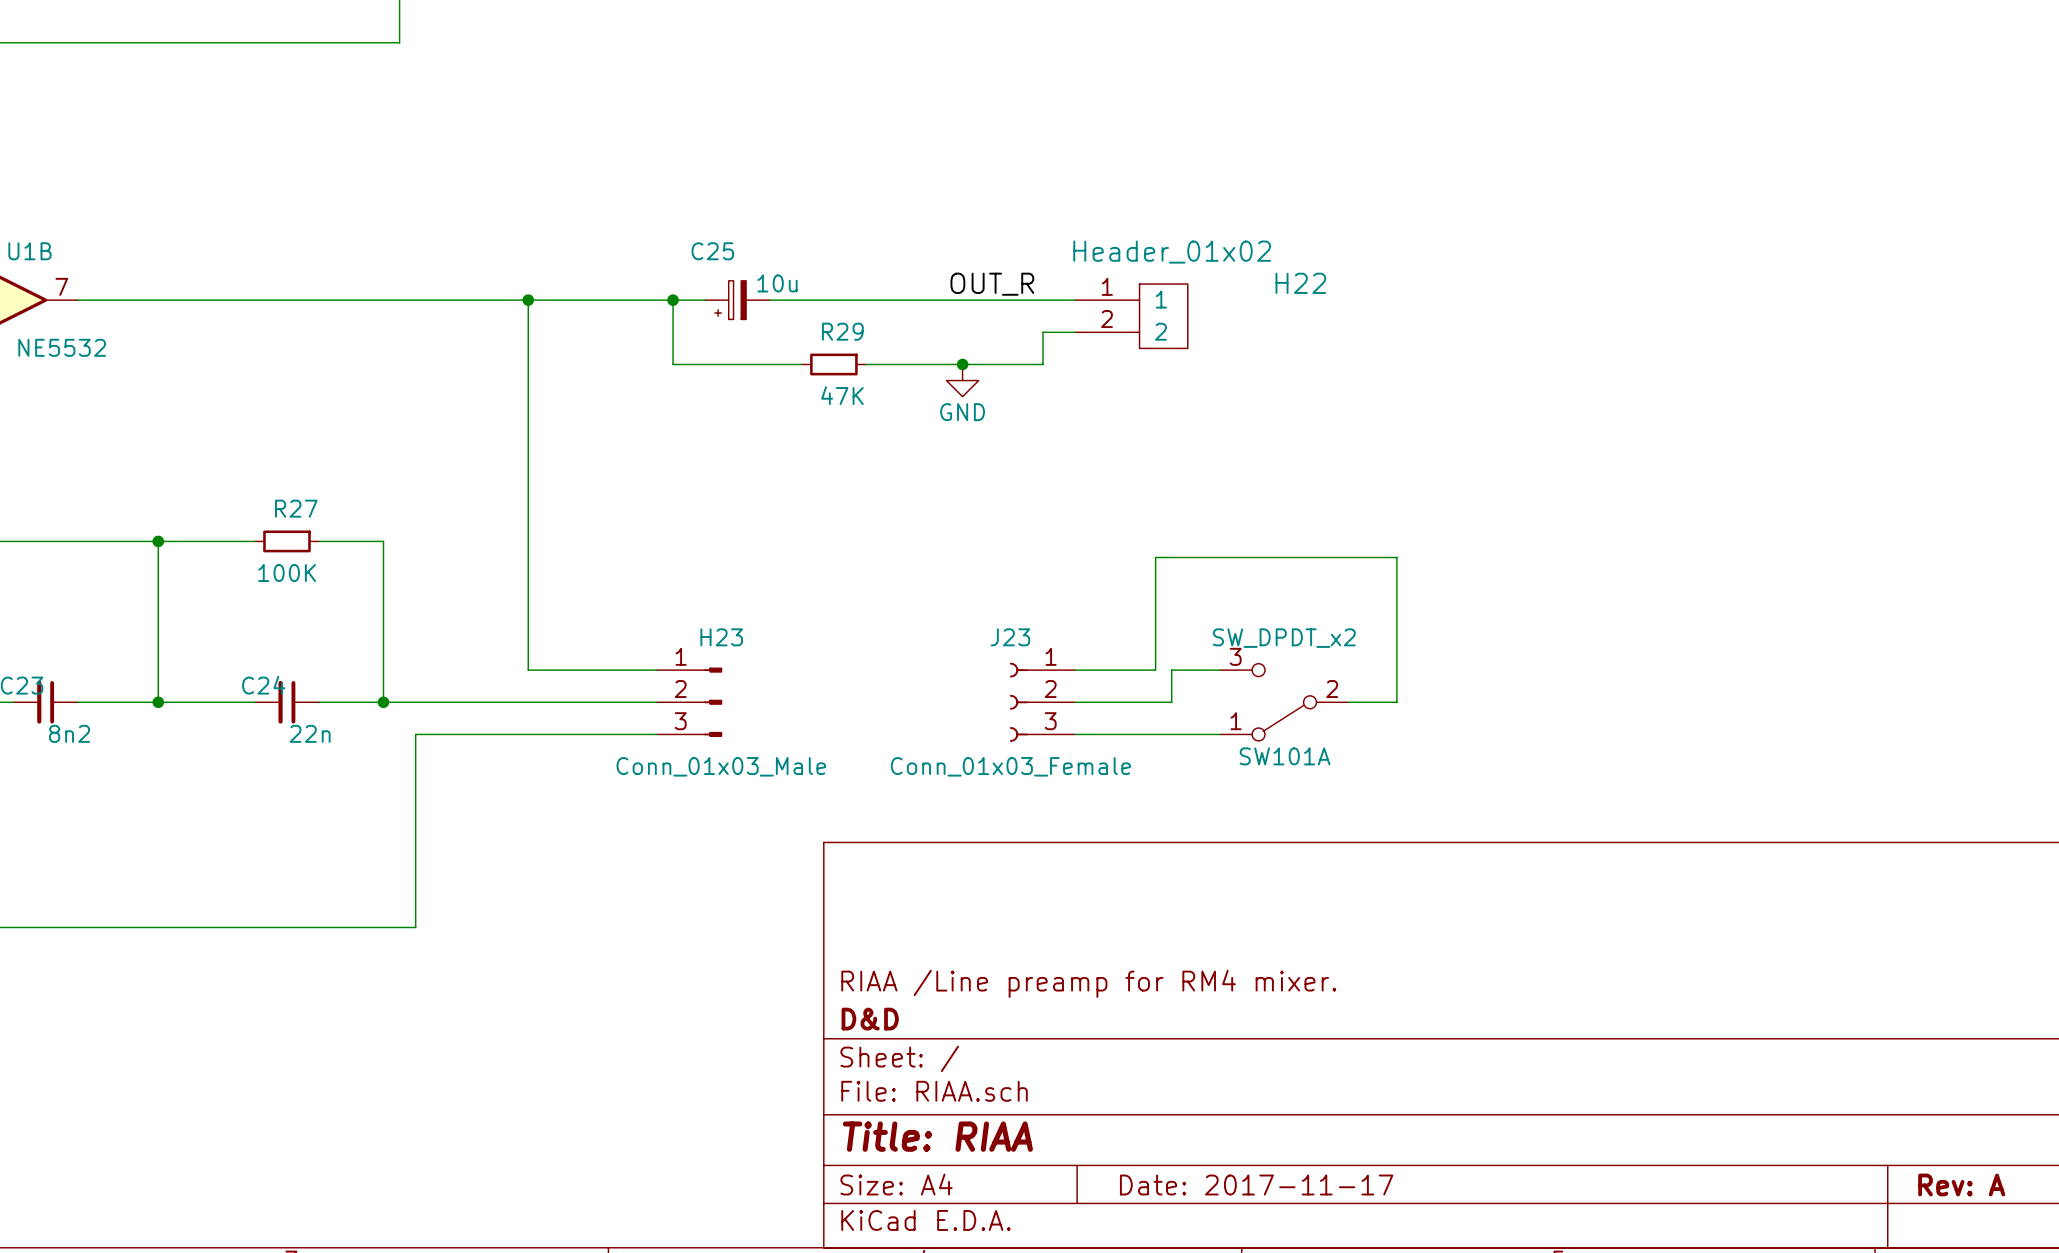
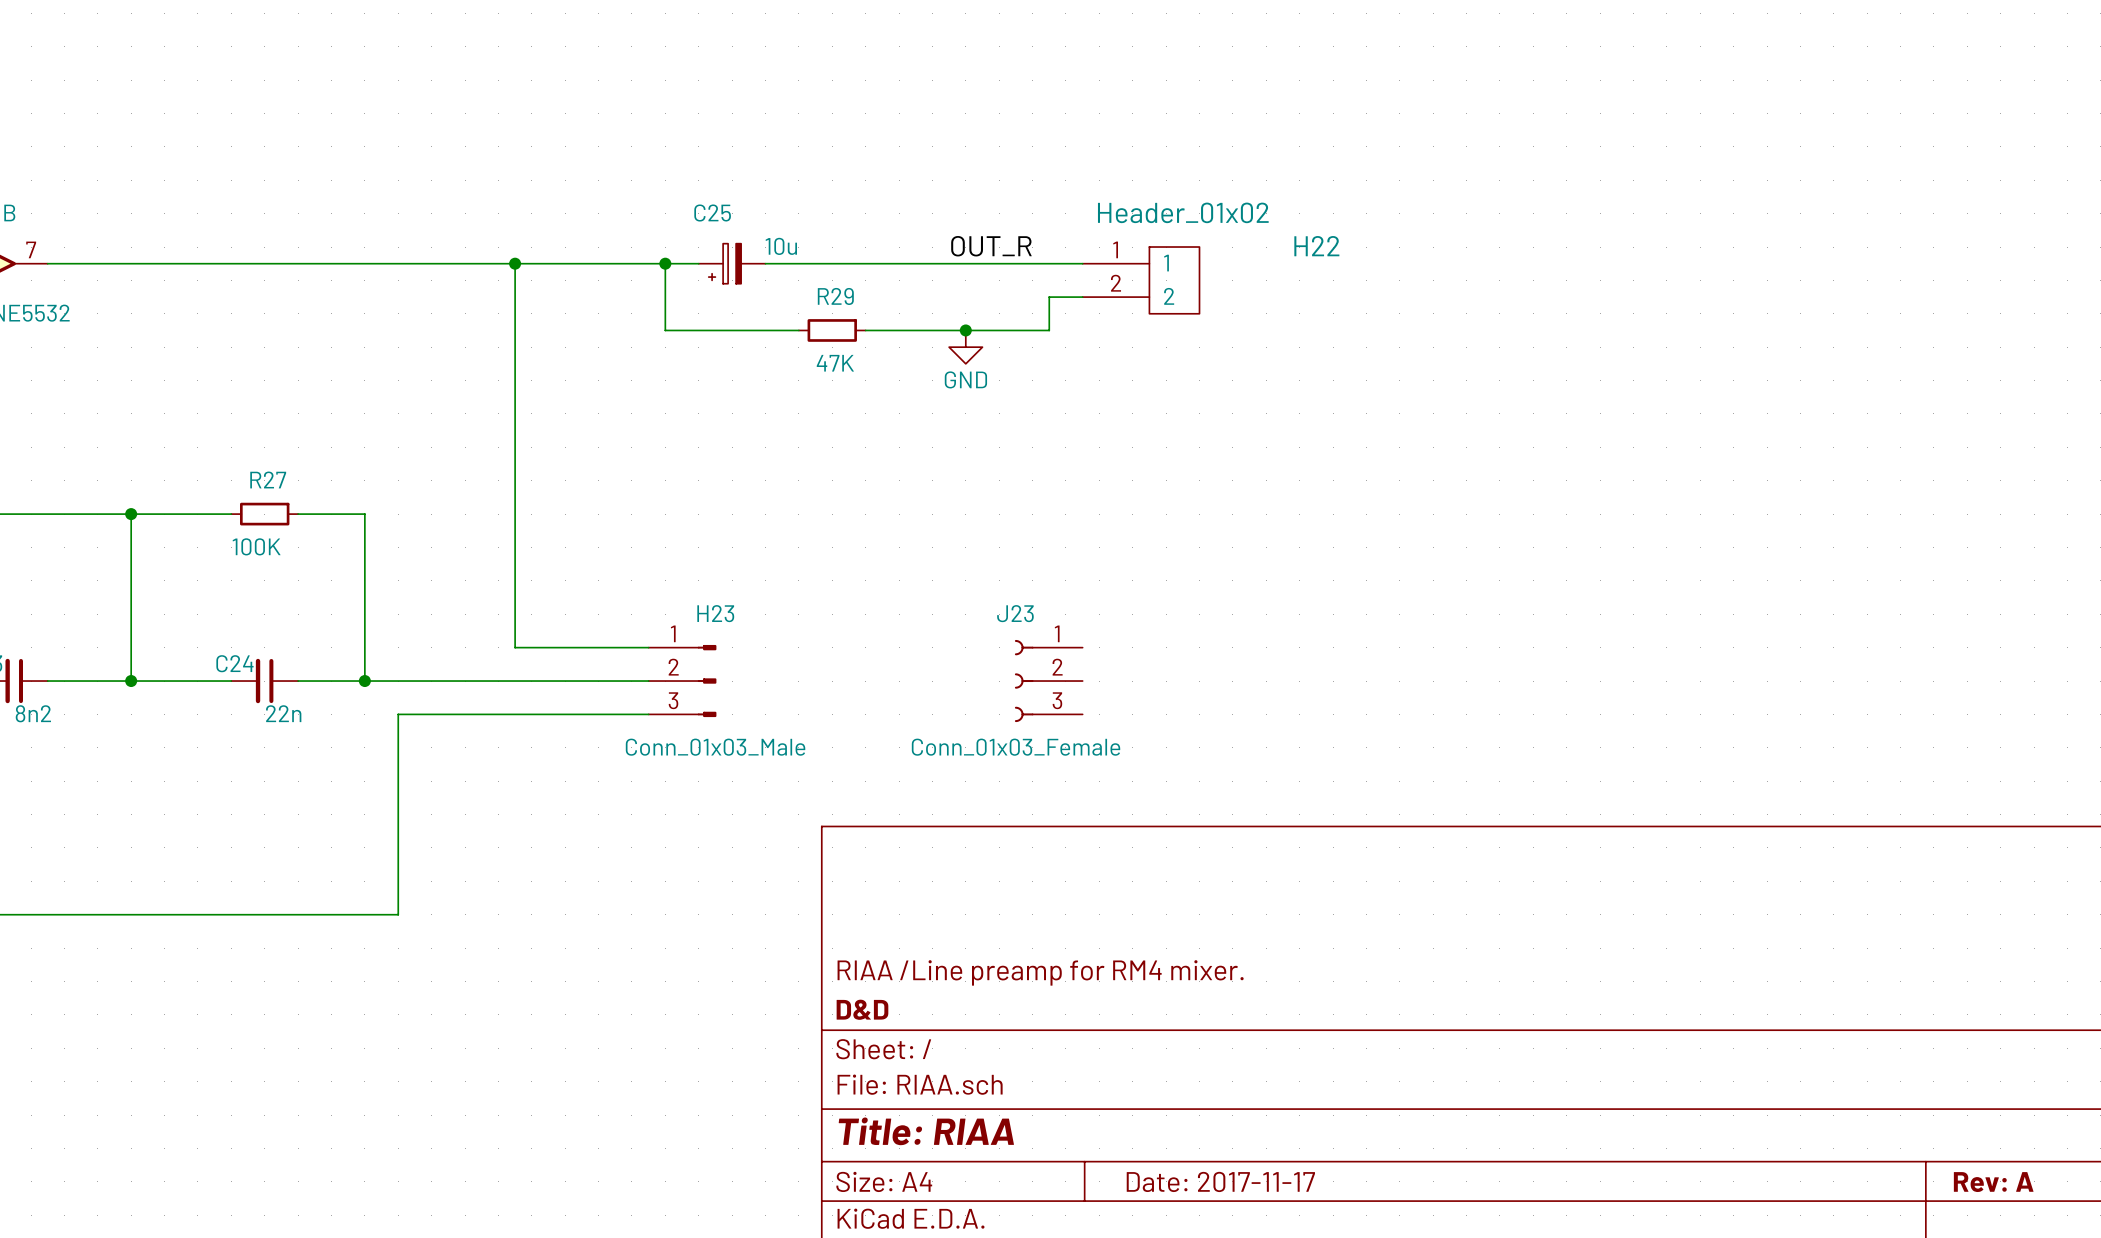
wire: (1075, 670) (1155, 670) (1155, 557) (1396, 557) (1396, 702) (1348, 702) -> none
wire: (1219, 670) (1171, 670) (1171, 702) (1075, 702) -> none
SW101A: SW_DPDT_x2 (1284, 702) -> none
wire: (1075, 734) (1219, 734) -> none

